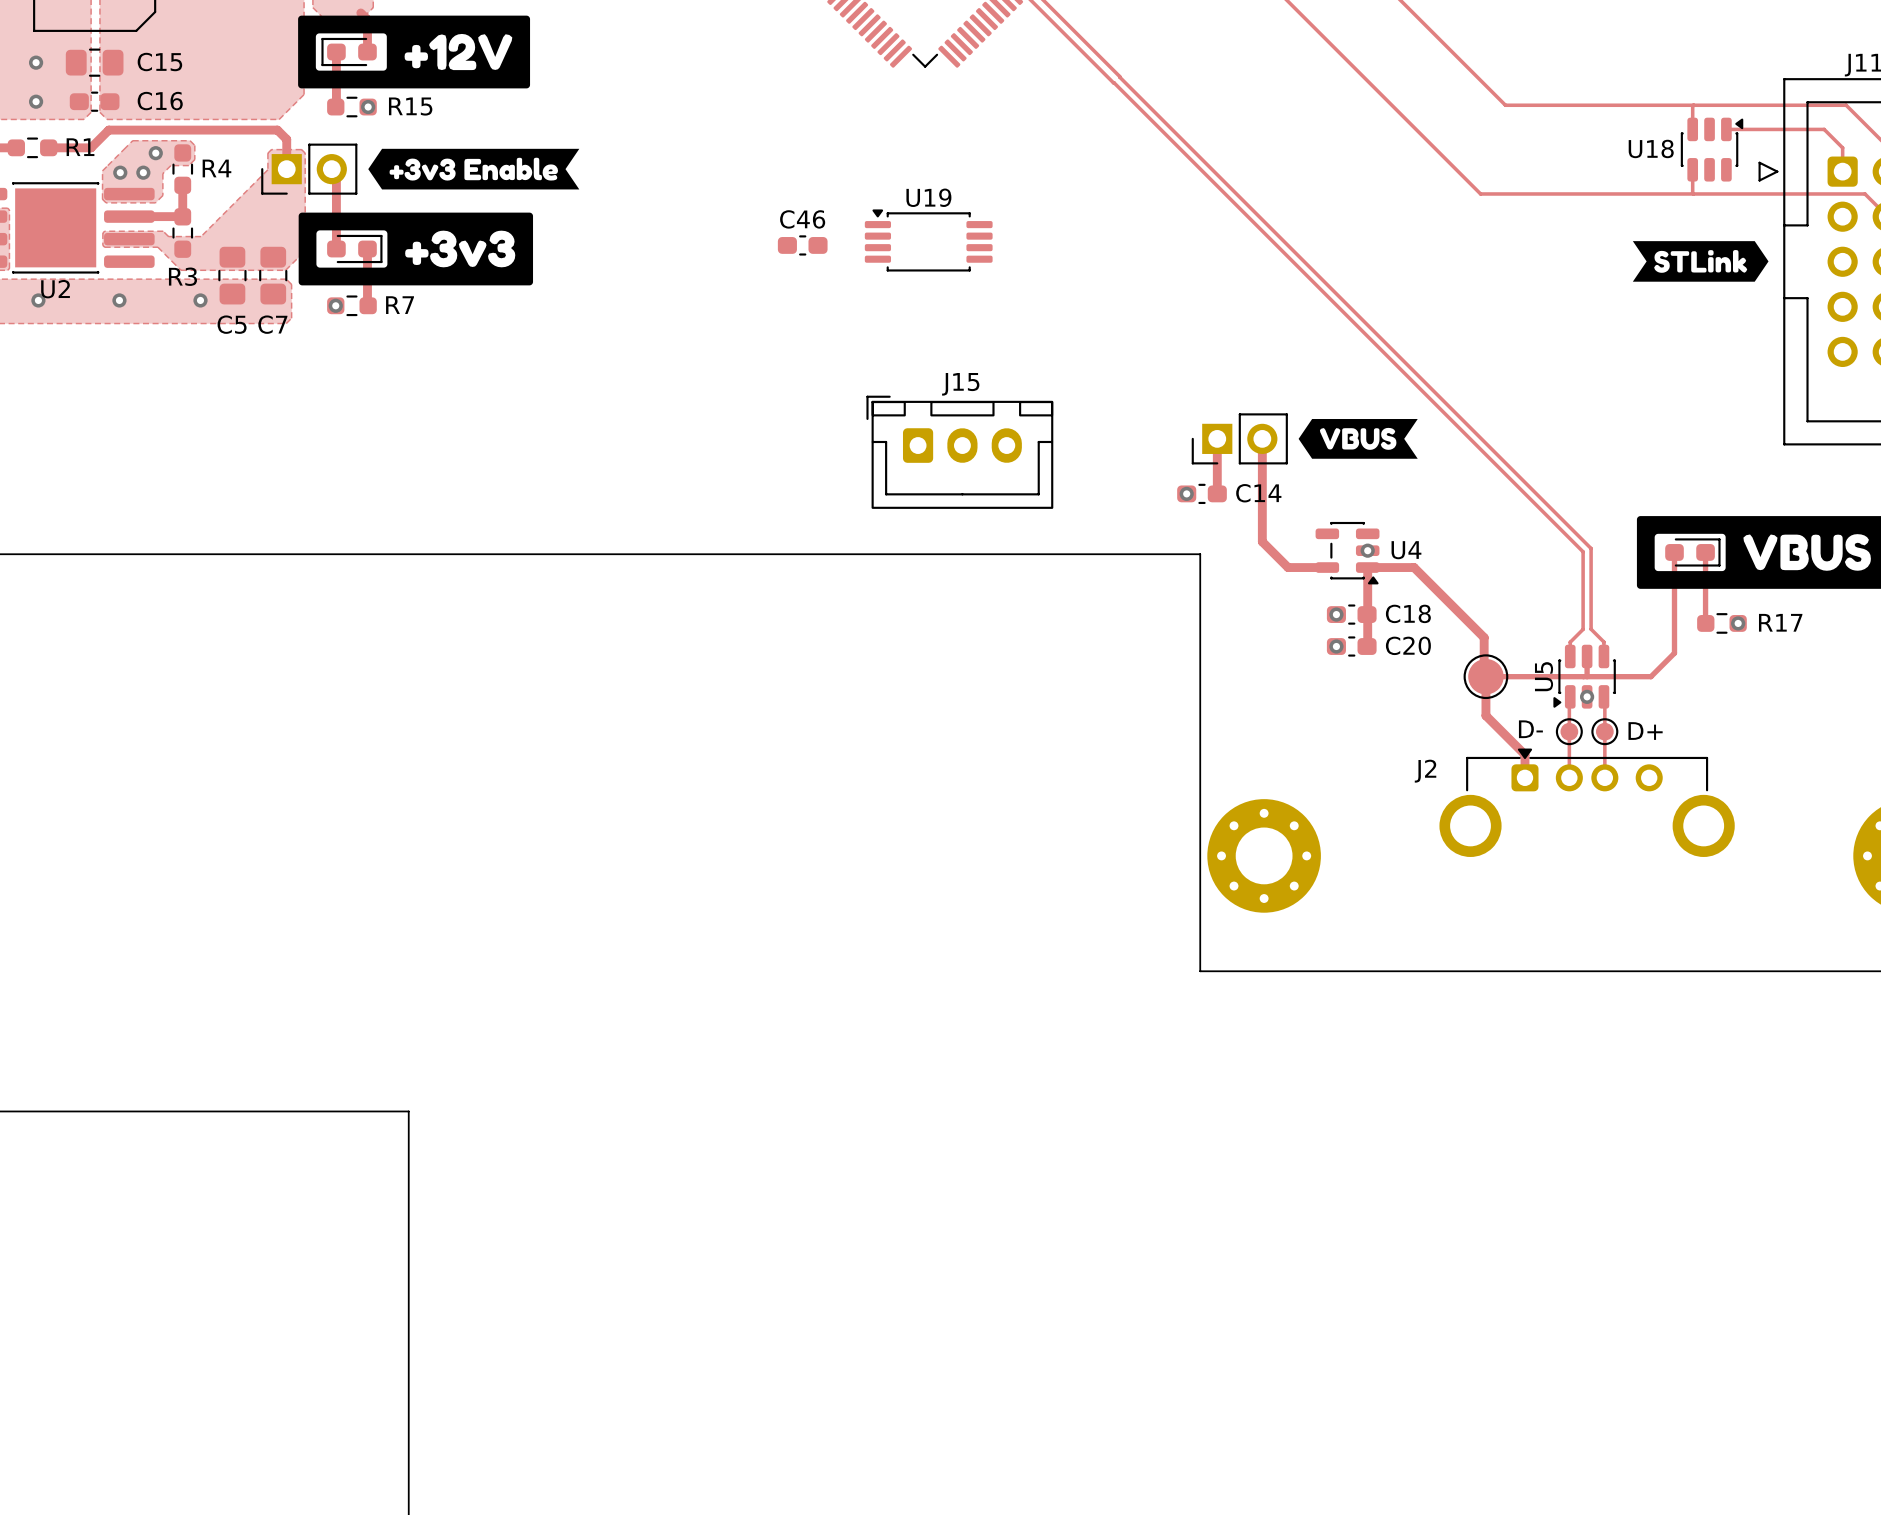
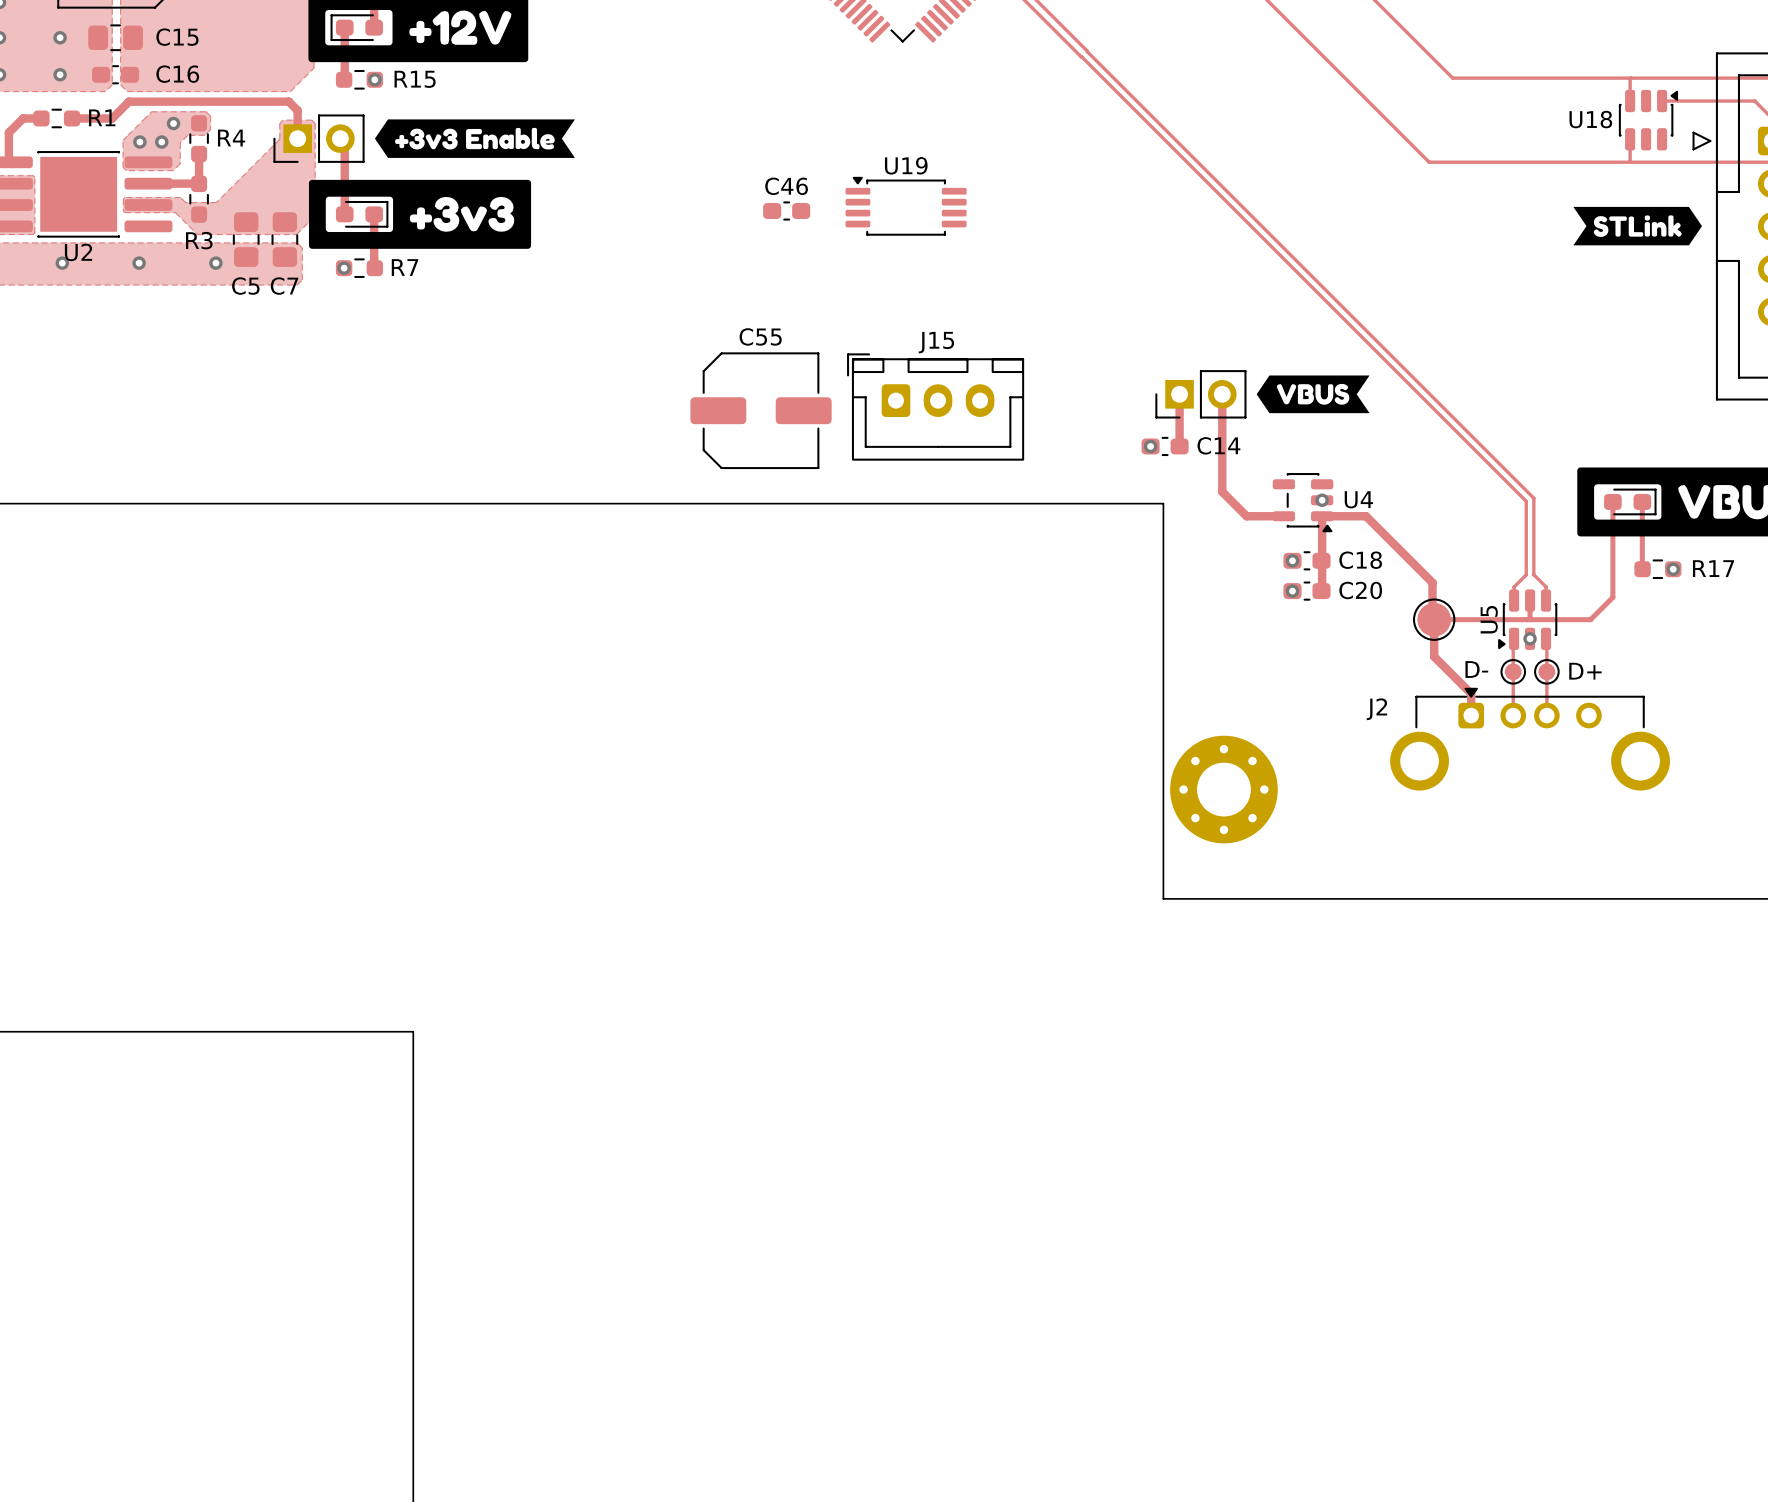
C55: none -> (761, 410)

